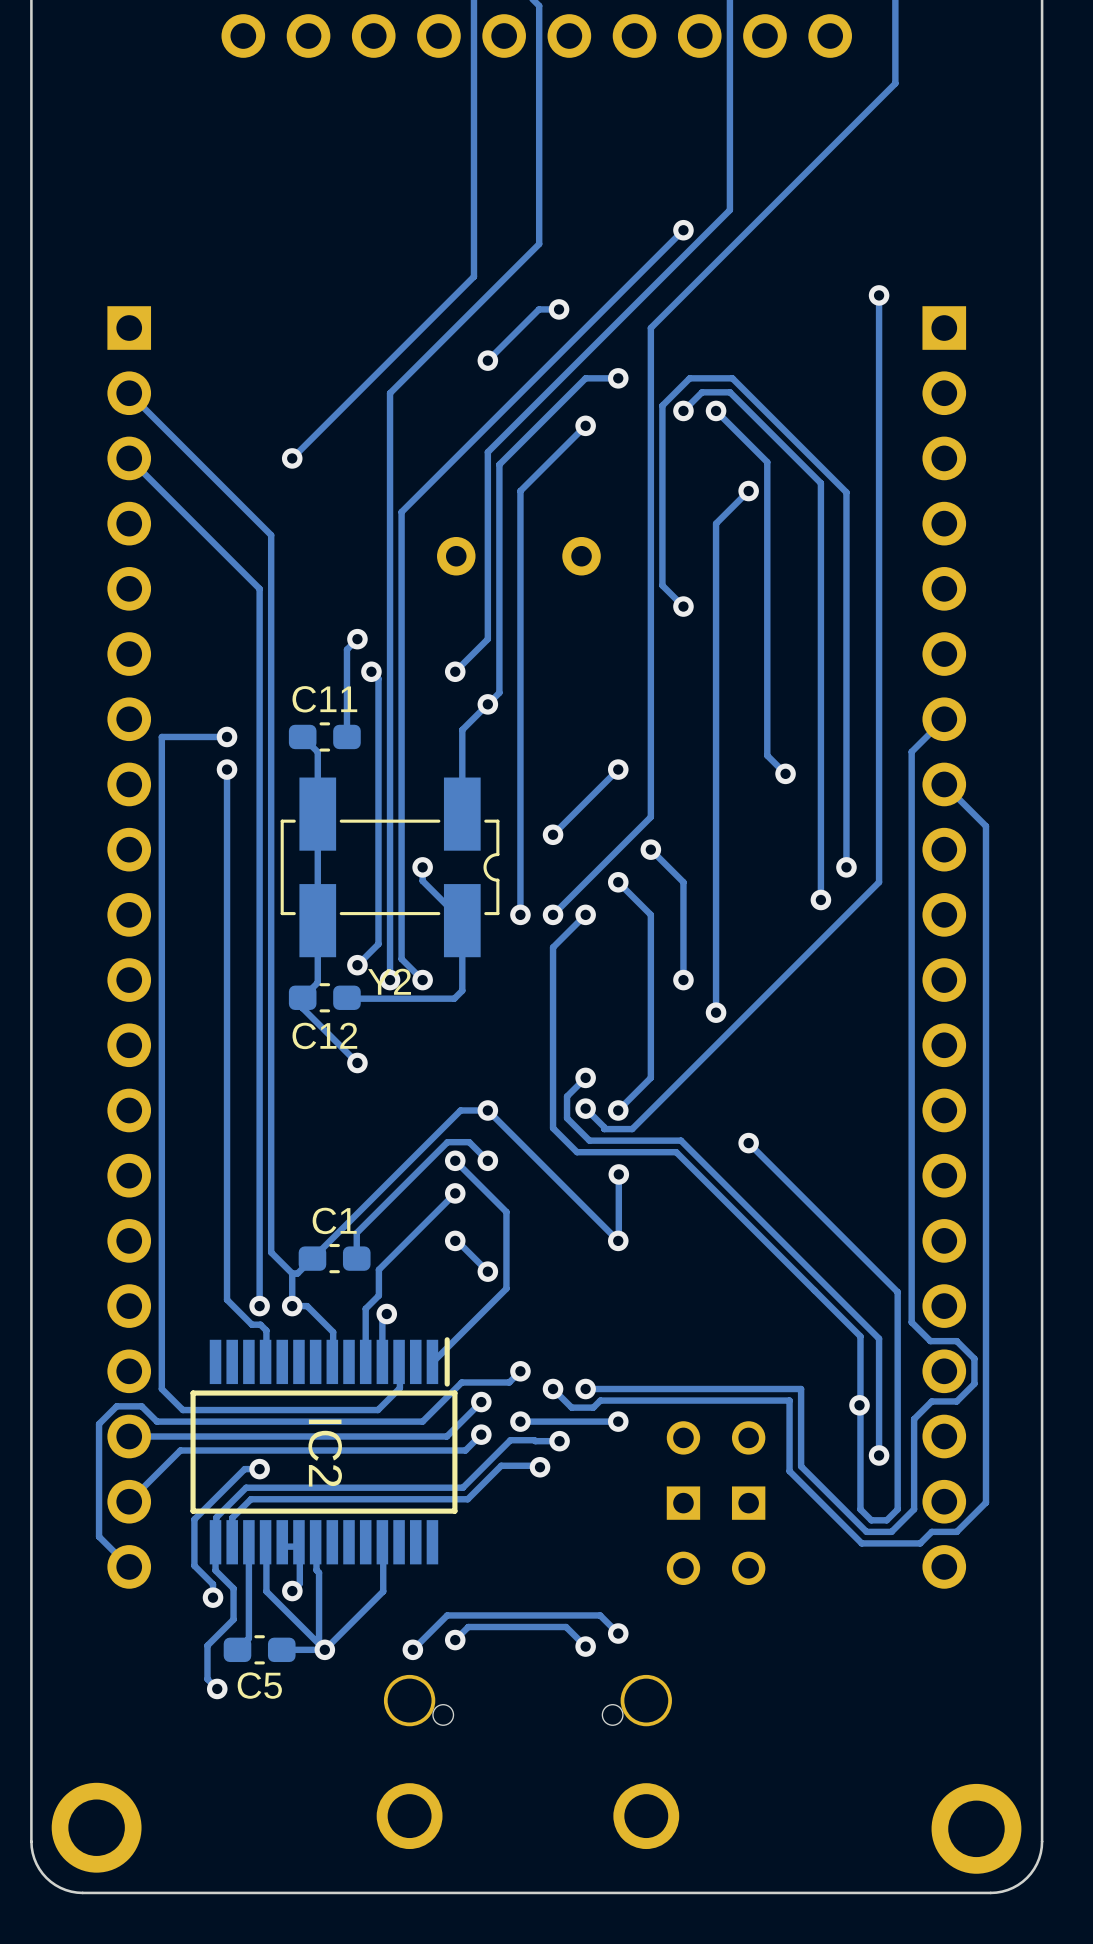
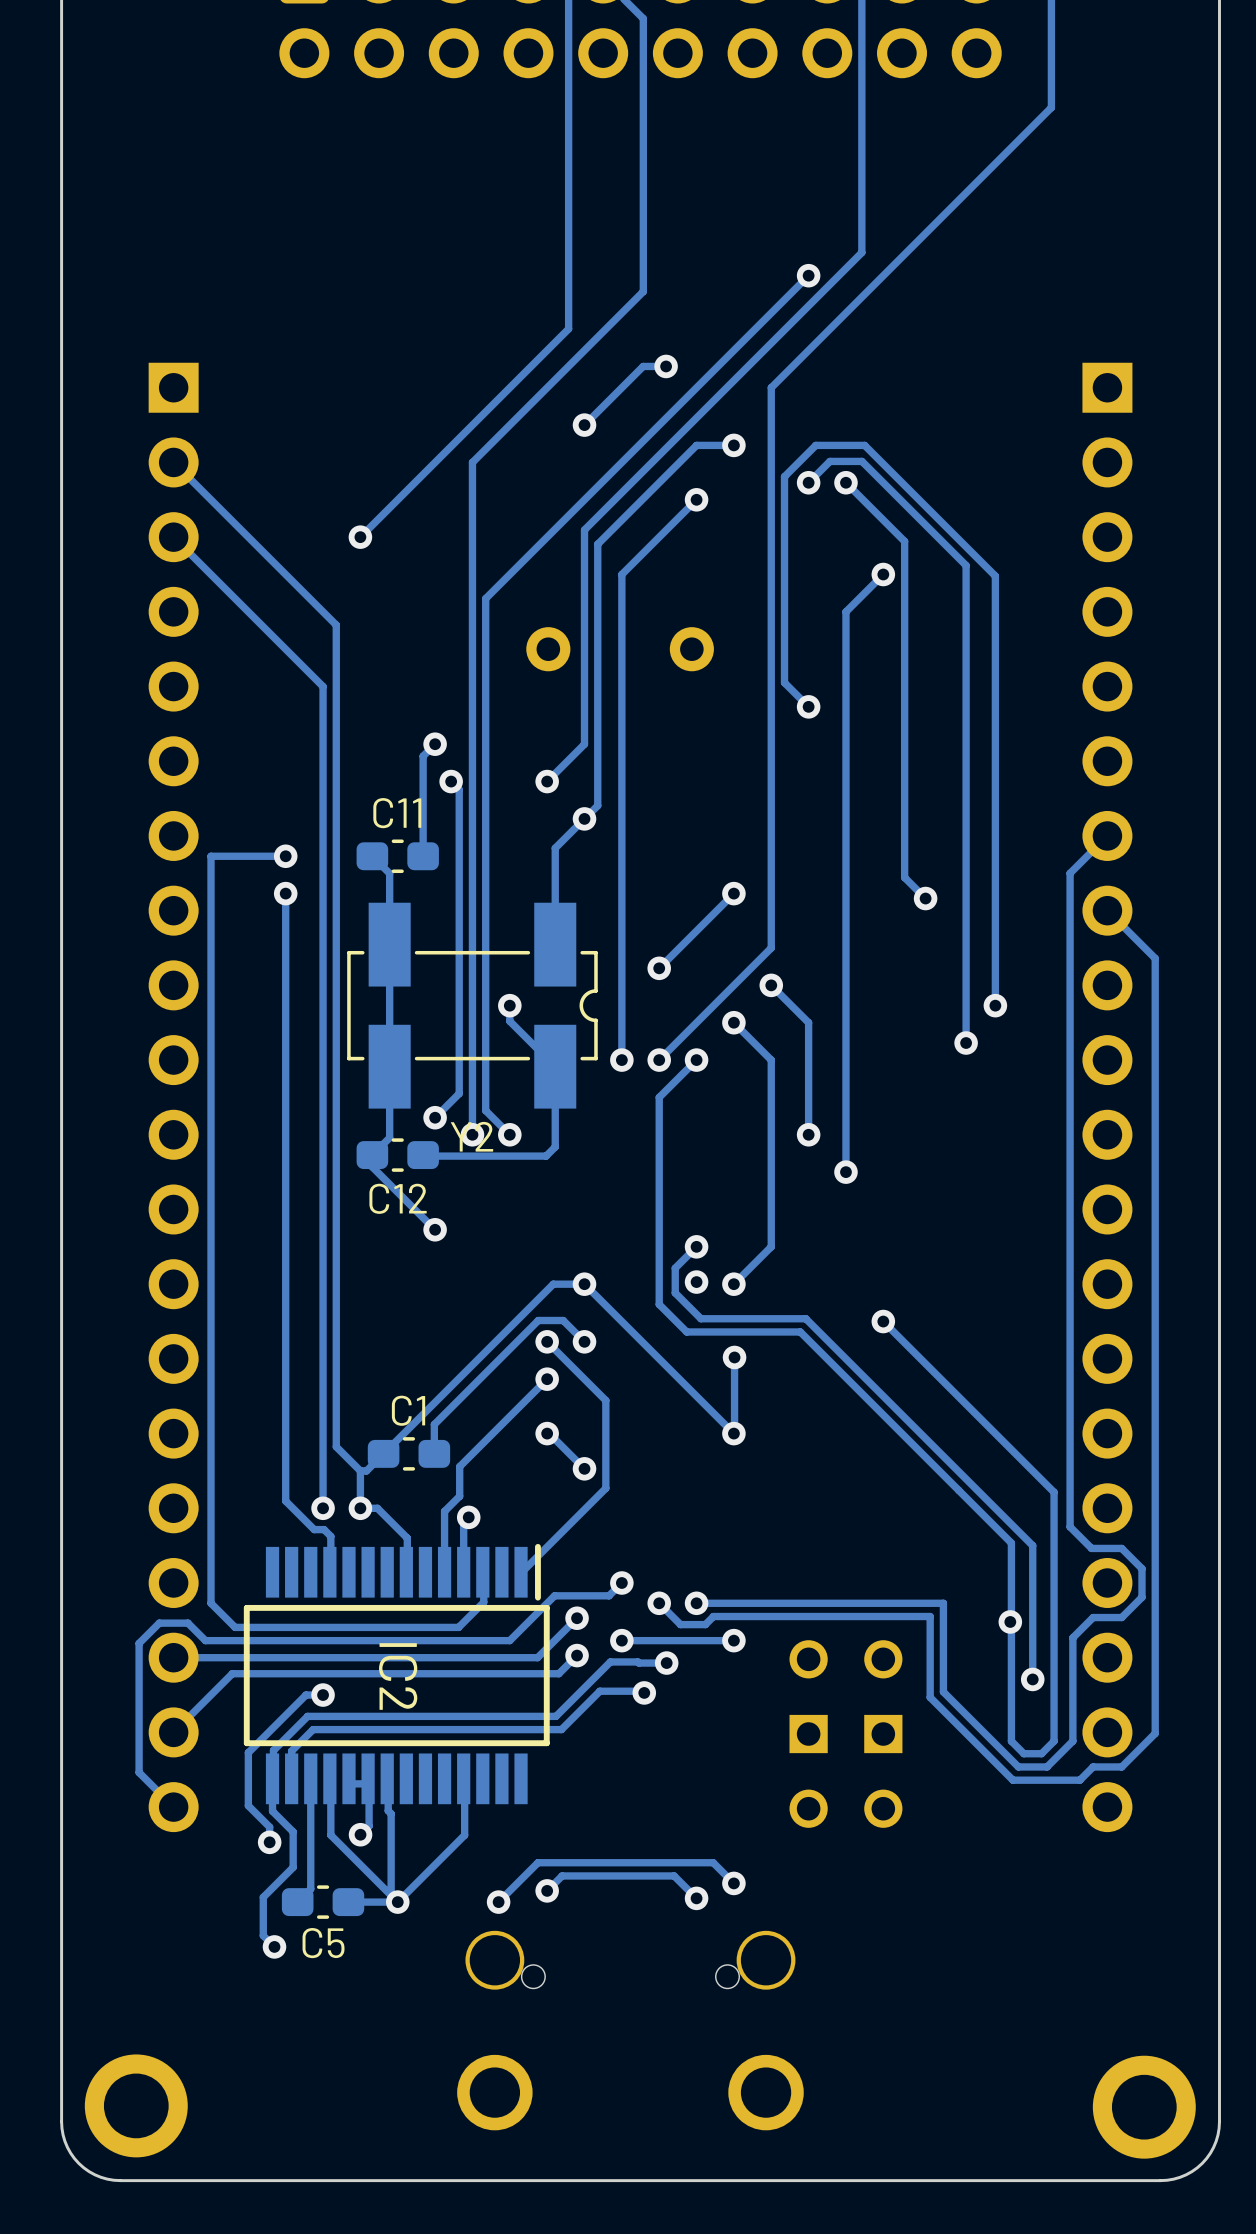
track: (879, 295) (879, 882) (632, 1129) (604, 1129) (585, 1108) -> none
via: (879, 295) -> none

